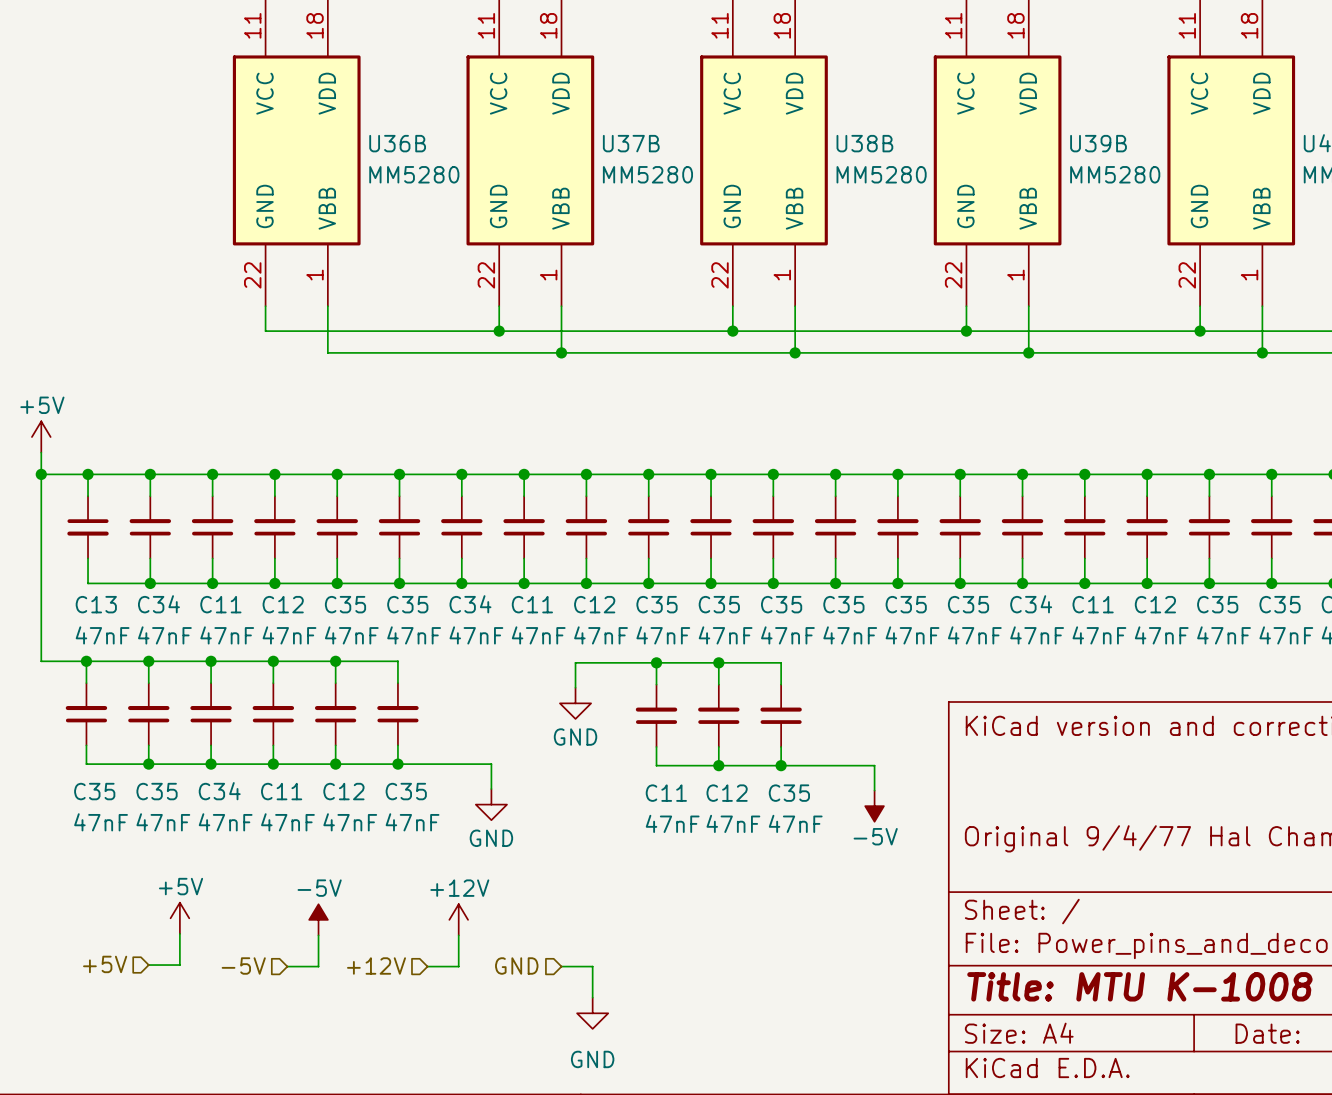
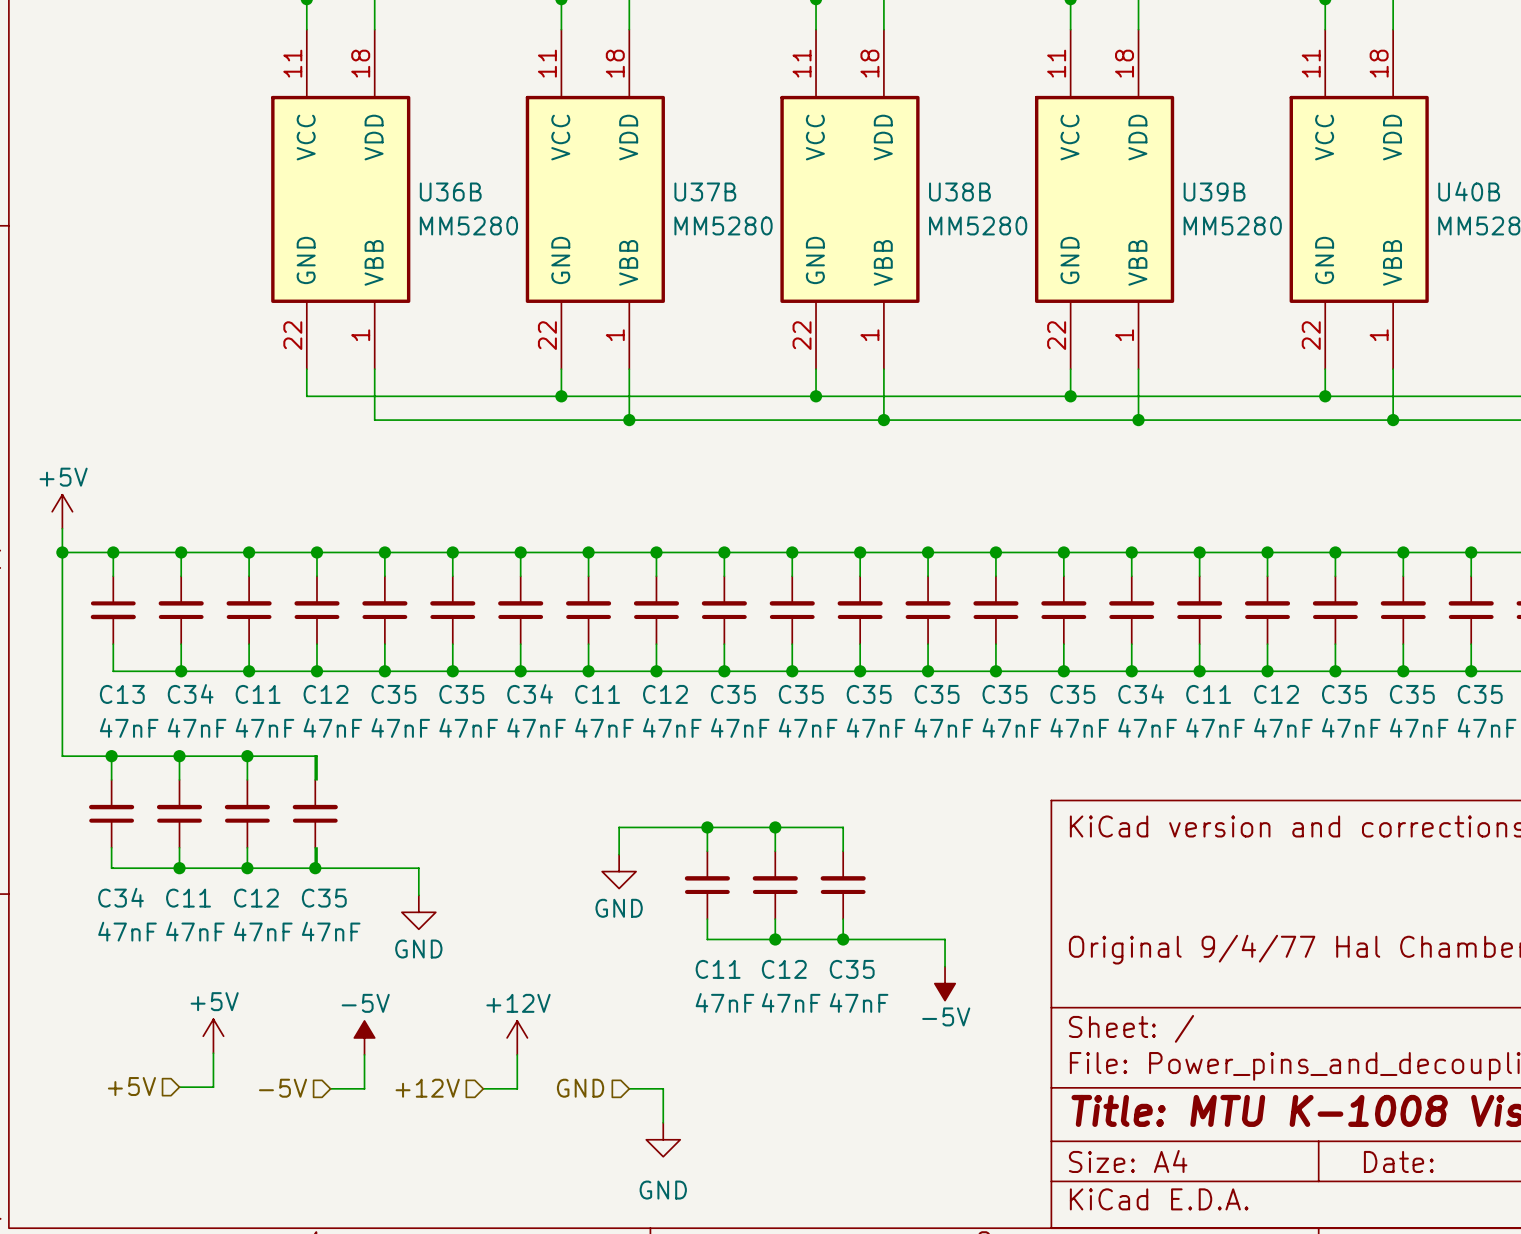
junction: (273, 661) -> none
wire: (274, 661) (397, 661) (397, 683) -> (316, 756) (316, 779)
wire: (335, 661) (335, 683) -> none
junction: (335, 661) -> none
wire: (656, 662) (656, 684) -> (707, 827) (707, 851)
junction: (656, 662) -> none
wire: (718, 662) (718, 684) -> (775, 827) (775, 851)
junction: (718, 662) -> none
wire: (781, 684) (781, 662) (575, 662) (575, 687) -> (843, 851) (843, 827) (619, 827) (619, 854)
power symbol: GND (575, 703) -> none
C12: 47nF (335, 714) -> none
C35: 47nF (397, 714) -> none
C11 position: (656, 715) -> (707, 885)
C12 position: (718, 715) -> (775, 885)
C35 position: (781, 715) -> (843, 885)
junction: none -> (707, 827)
junction: none -> (775, 827)
wire: (335, 745) (335, 764) -> (316, 847) (316, 868)
wire: (397, 745) (397, 764) -> none
wire: (656, 746) (656, 765) (874, 765) (874, 790) -> (707, 919) (707, 939) (945, 939) (945, 966)
wire: (718, 746) (718, 765) -> (775, 919) (775, 939)
wire: (781, 746) (781, 765) -> (843, 919) (843, 939)
junction: (335, 764) -> none
wire: (368, 764) (491, 764) (491, 789) -> (418, 868) (418, 895)
junction: (397, 764) -> none
junction: (718, 765) -> none
junction: (781, 765) -> none
power symbol: none -> GND (619, 871)
C35 name: C35 (94, 791) -> C34 (121, 897)
C35 name: C35 (157, 791) -> C11 (188, 898)
C34 name: C34 (219, 791) -> C12 (256, 898)
C11 name: C11 (281, 791) -> C35 (324, 898)
power symbol: none -> GND (418, 912)
power symbol: GND (491, 804) -> none
power symbol position: -5V (874, 806) -> -5V (945, 983)
junction: none -> (775, 939)
junction: none -> (843, 939)

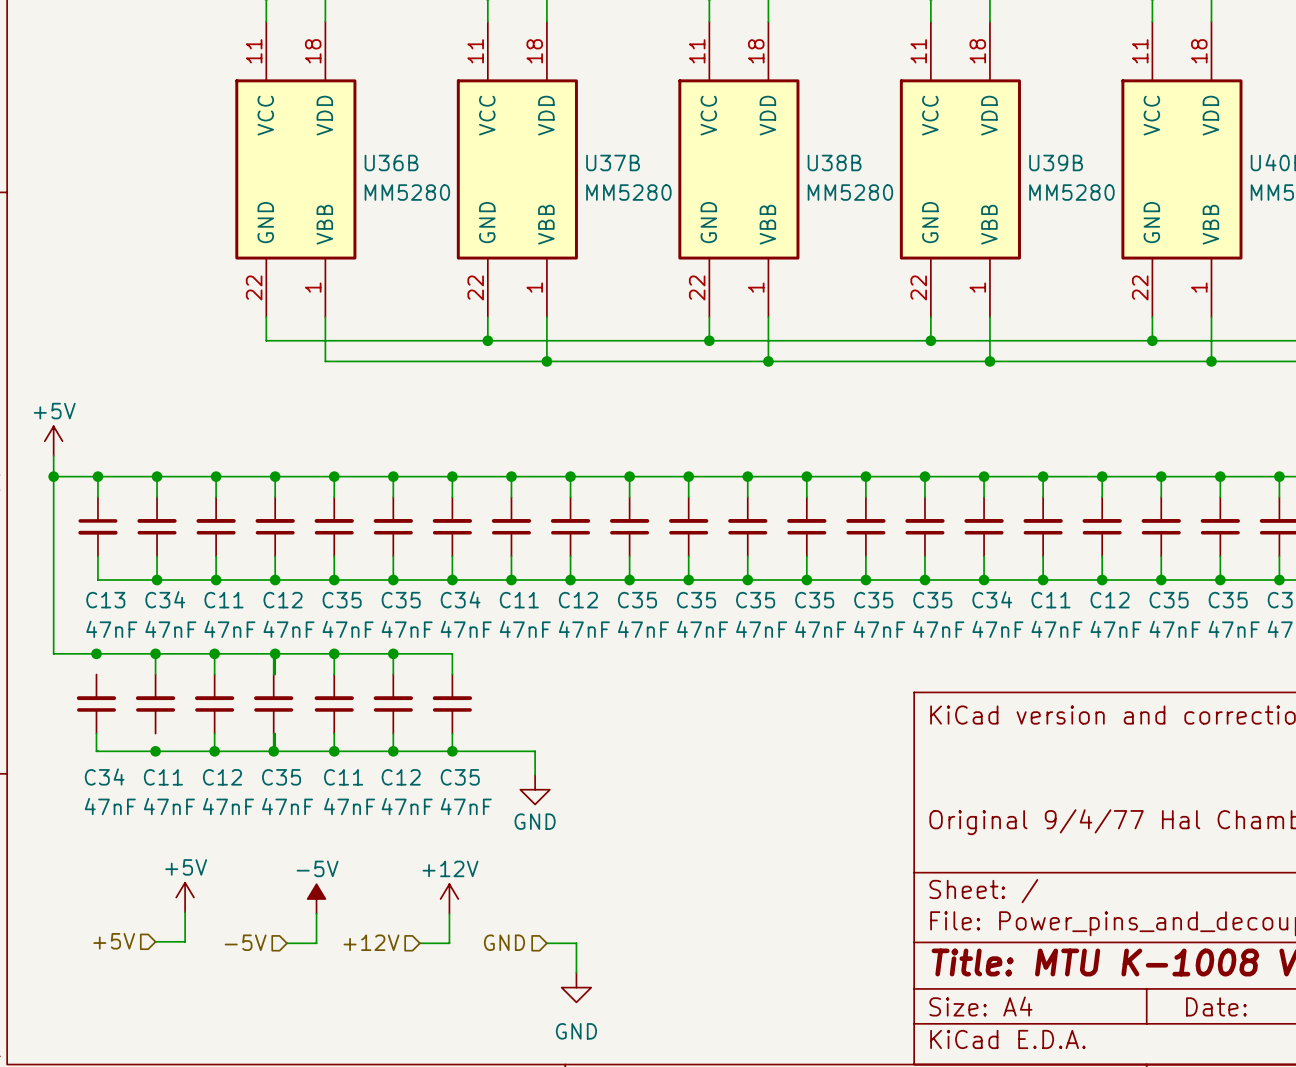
wire: (111, 756) (111, 779) -> none
wire: none -> (275, 653) (452, 653) (452, 674)
junction: none -> (275, 653)
junction: none -> (334, 653)
junction: none -> (393, 653)
wire: (707, 827) (707, 851) -> (334, 653) (334, 674)
junction: (707, 827) -> none
wire: (775, 827) (775, 851) -> (393, 653) (393, 674)
junction: (775, 827) -> none
wire: (179, 847) (179, 868) -> (334, 733) (334, 751)
wire: (843, 851) (843, 827) (619, 827) (619, 854) -> none
junction: none -> (334, 751)
wire: (418, 868) (418, 895) -> (363, 751) (535, 751) (535, 774)
junction: none -> (393, 751)
junction: none -> (452, 751)
power symbol position: GND (619, 871) -> GND (535, 789)
C11 position: (707, 885) -> (334, 704)
C12 position: (775, 885) -> (393, 704)
C35 position: (843, 885) -> (452, 704)
power symbol: GND (418, 912) -> none
wire: (707, 919) (707, 939) (945, 939) (945, 966) -> none
wire: (775, 919) (775, 939) -> (393, 733) (393, 751)
wire: (843, 919) (843, 939) -> (452, 733) (452, 751)
junction: (775, 939) -> none
junction: (843, 939) -> none
power symbol: -5V (945, 983) -> none

